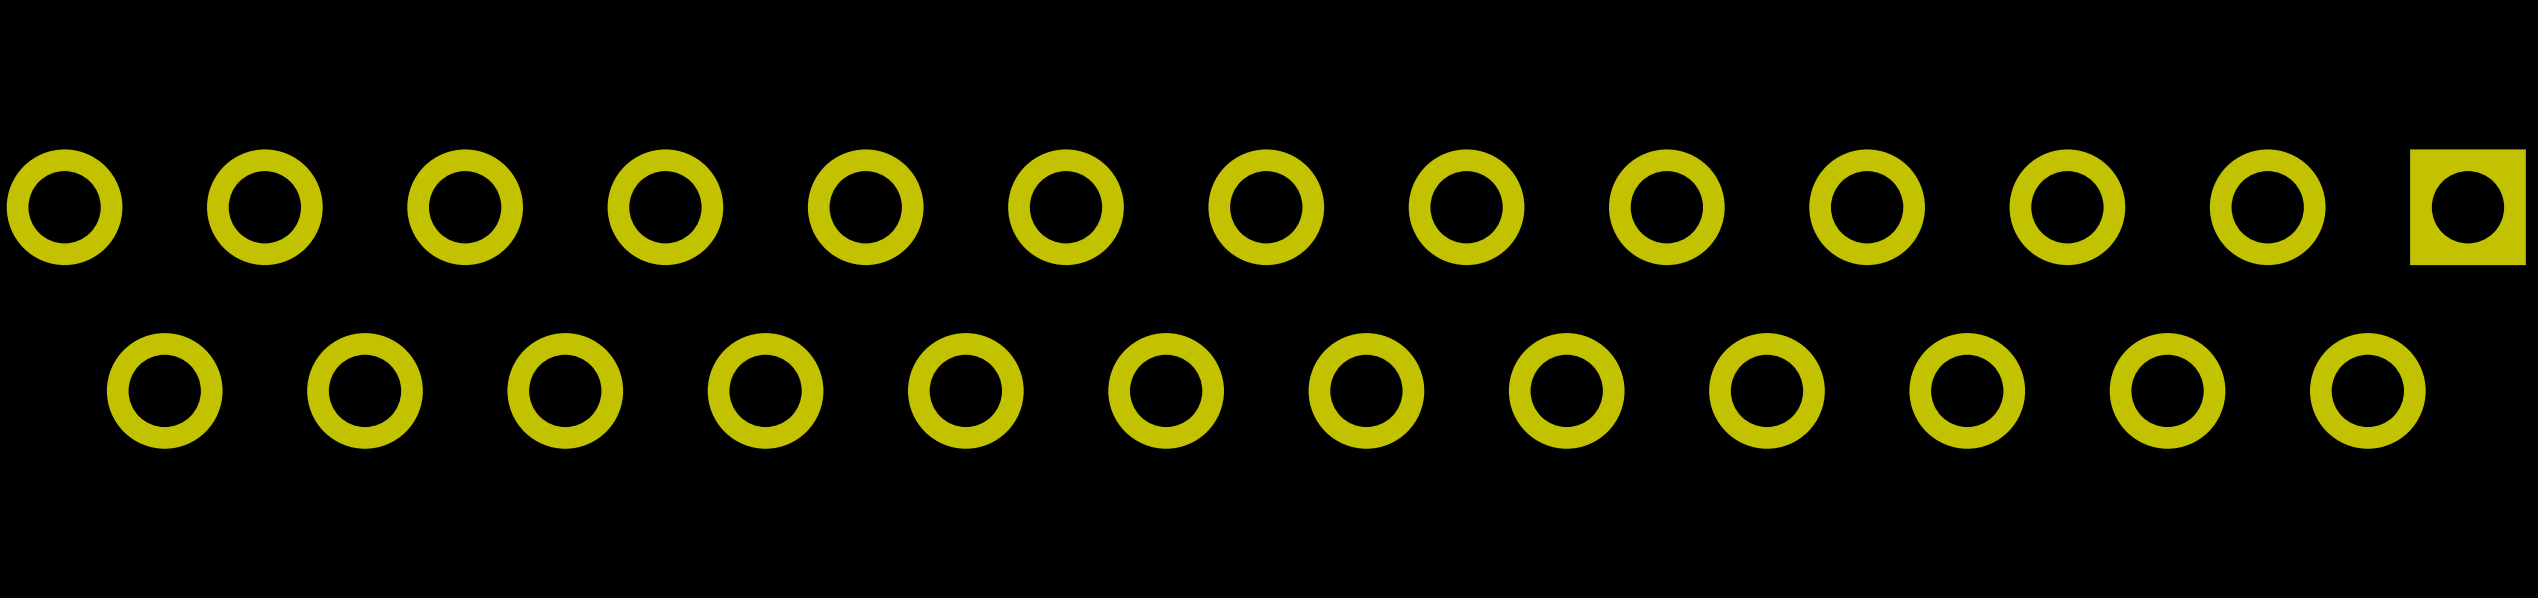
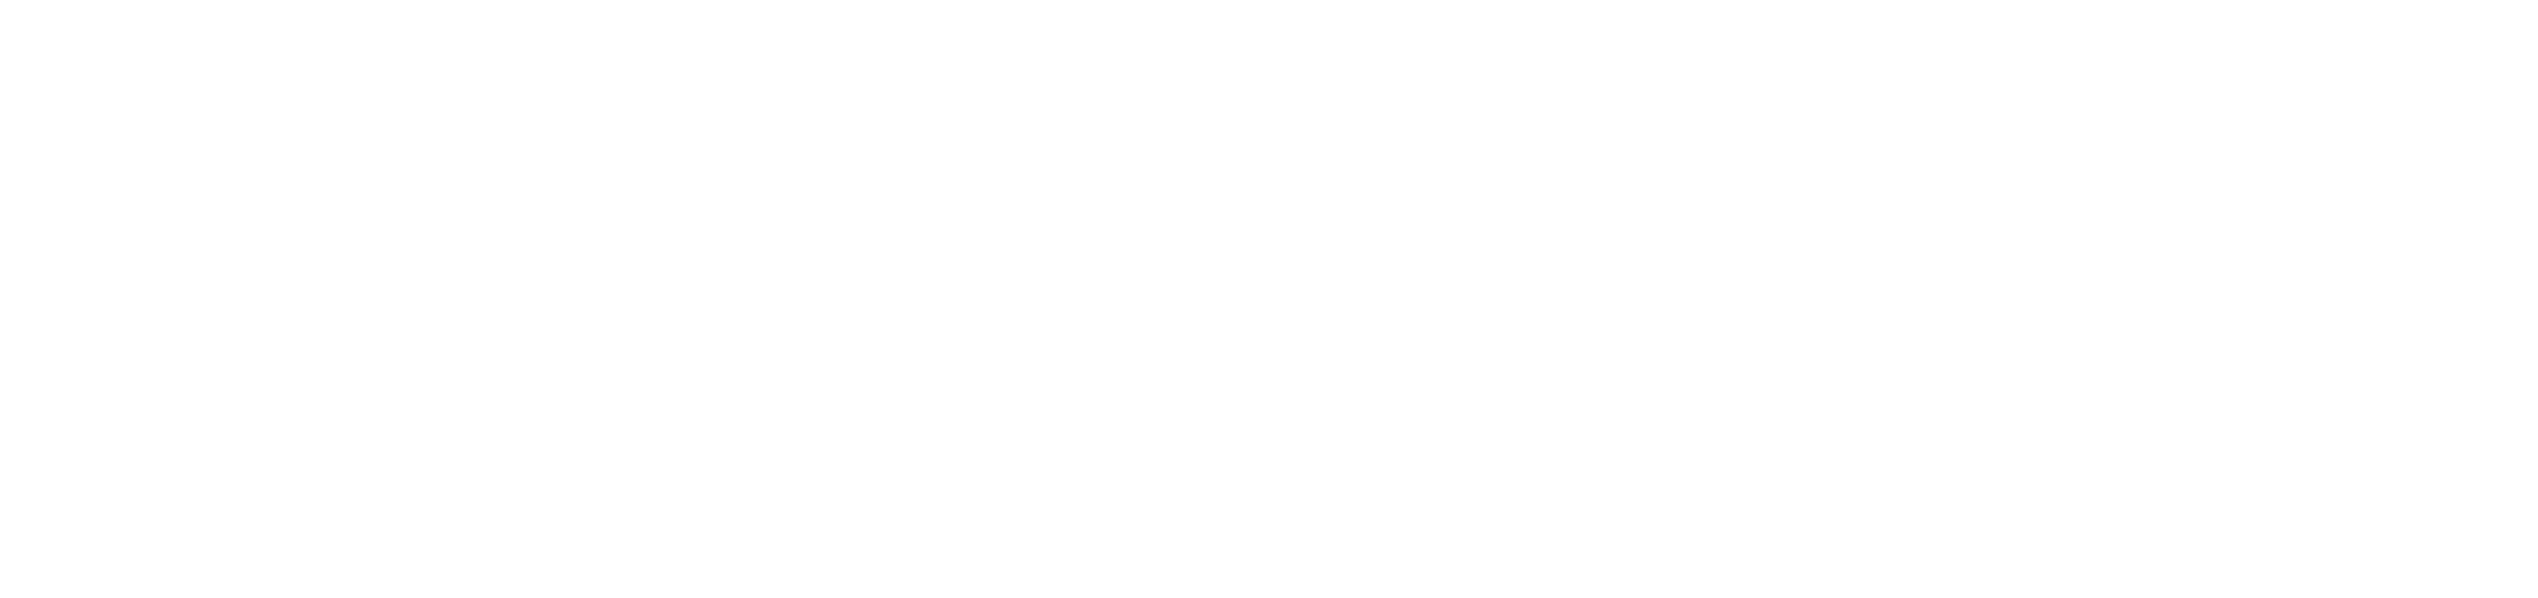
part: (1266, 299) -> none

